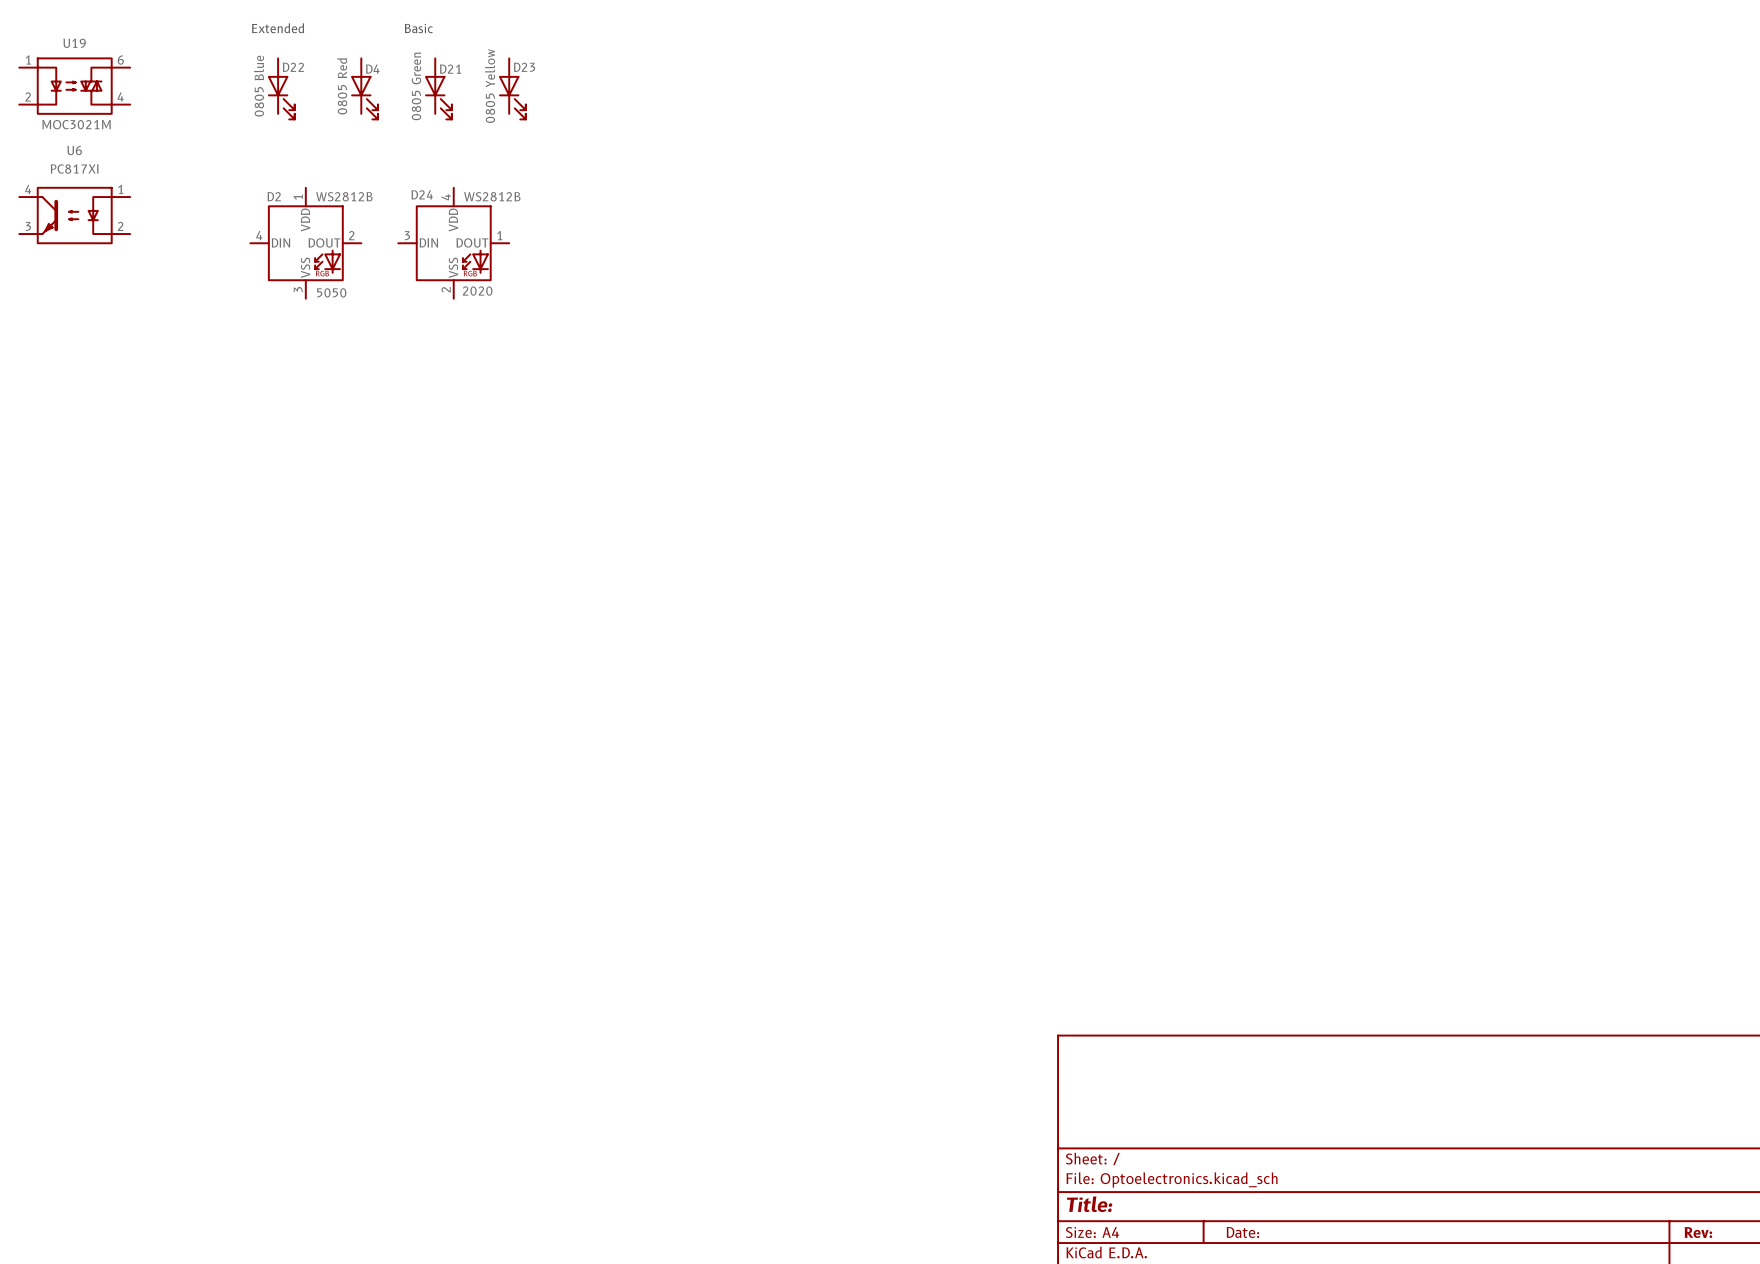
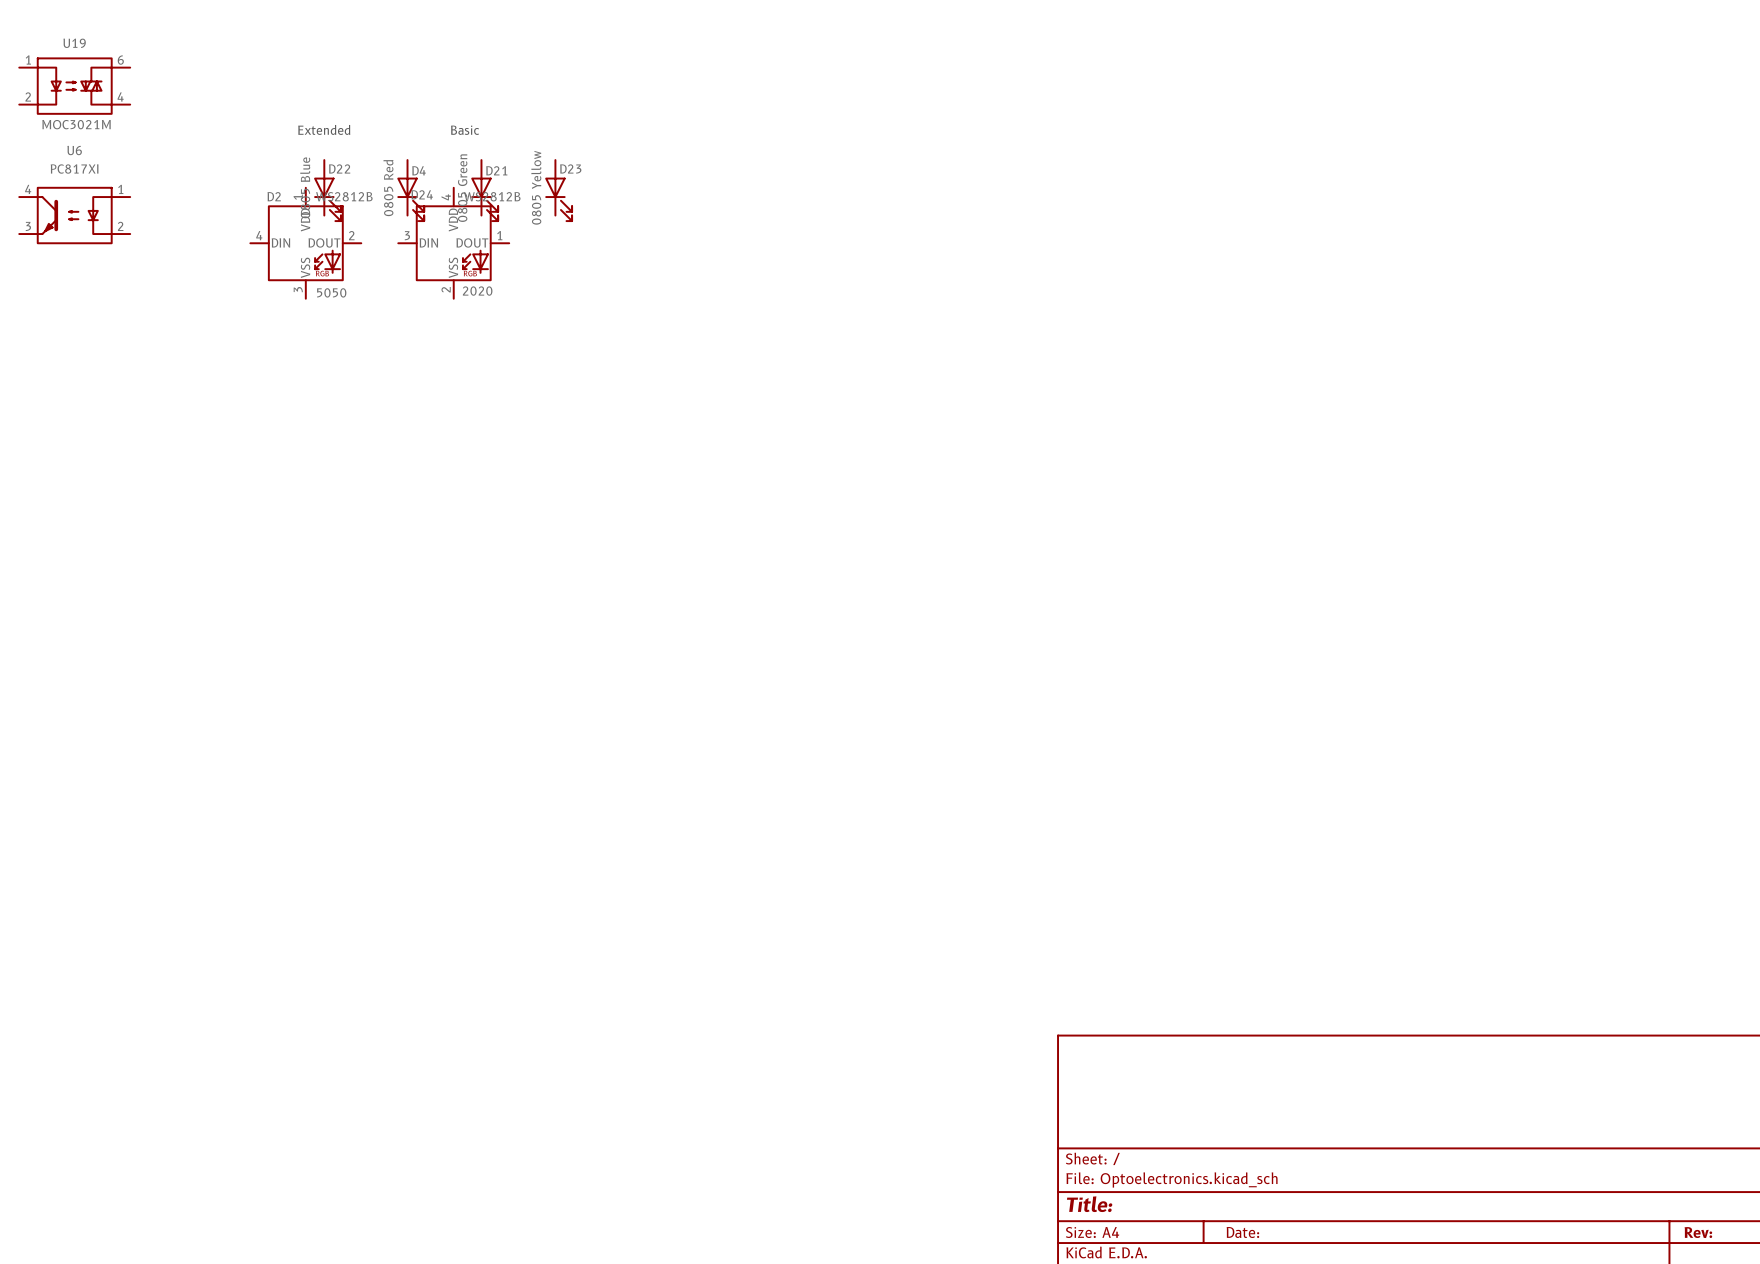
text position: Extended (278, 28) -> Extended (324, 129)
text position: Basic (418, 28) -> Basic (465, 130)
D22 position: (281, 88) -> (327, 190)
D4 position: (364, 88) -> (410, 190)
D21 position: (438, 88) -> (484, 190)
D23 position: (512, 88) -> (558, 190)

